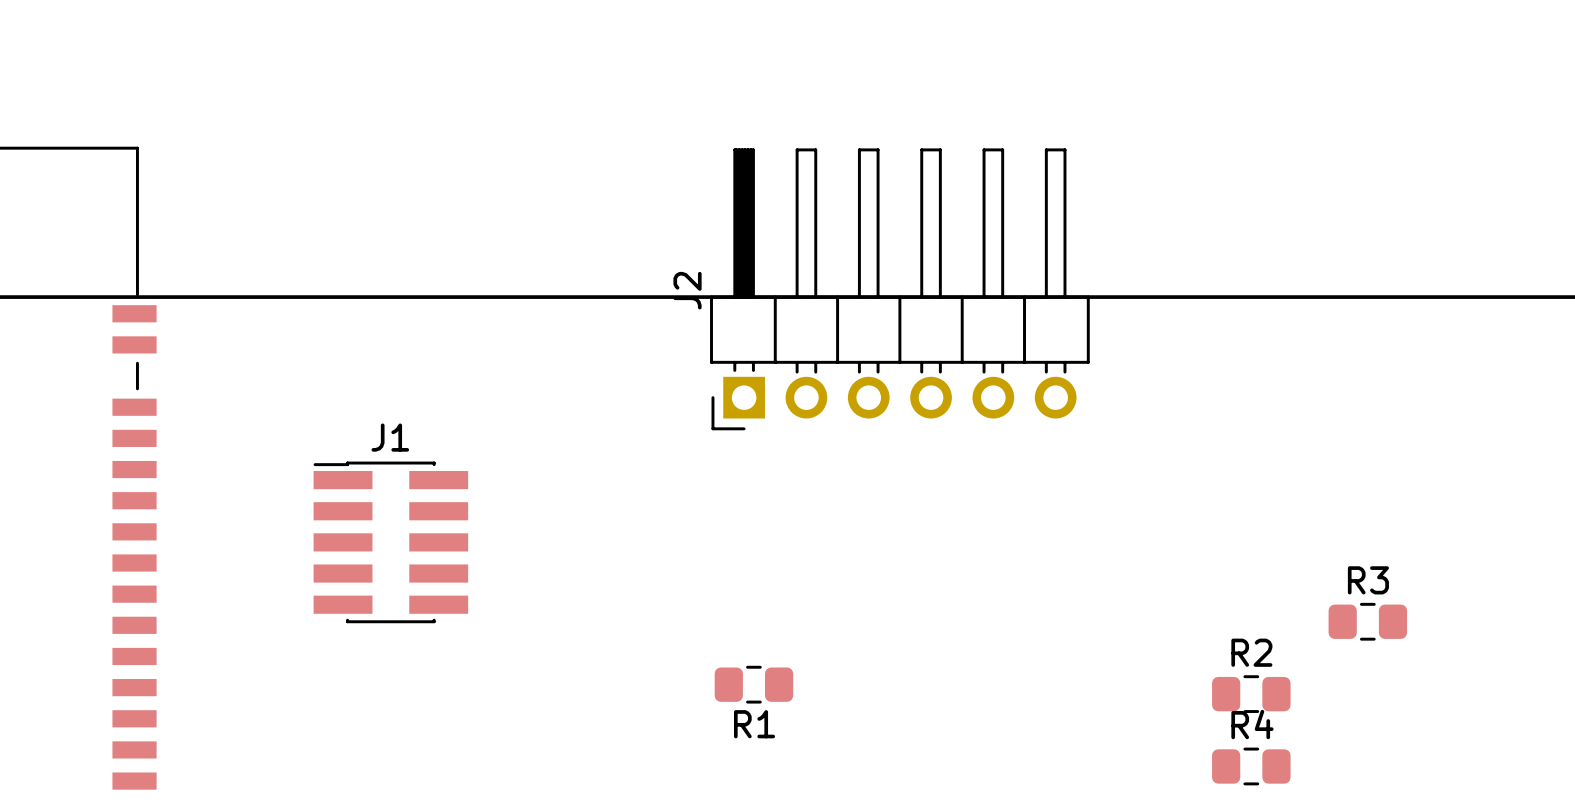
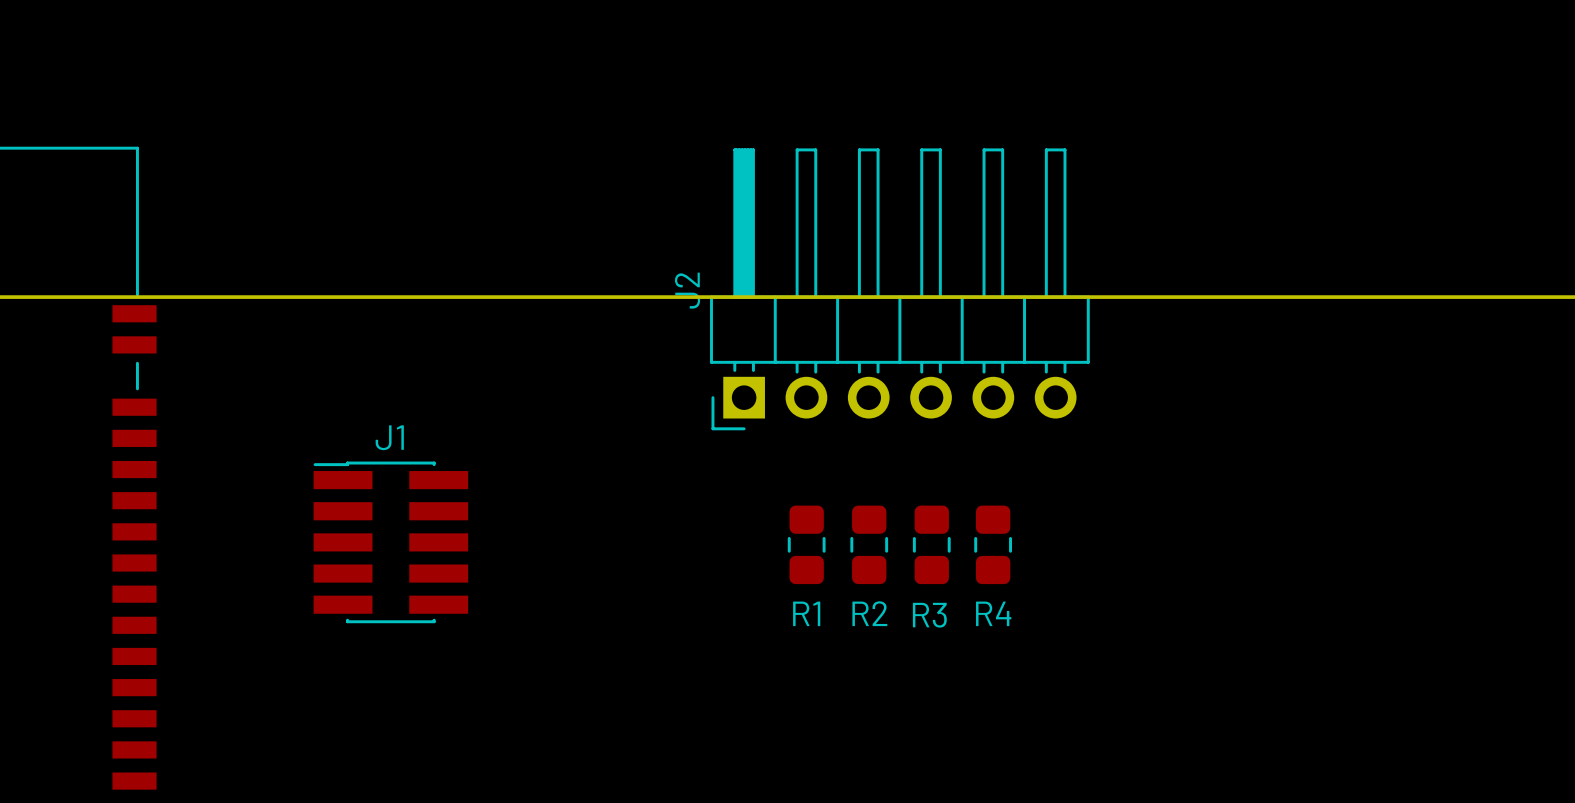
R3 name position: R3 (1368, 580) -> R3 (929, 615)
R3 rotation: 0° (1367, 621) -> 90° clockwise (931, 544)
R3 position: (1367, 621) -> (931, 544)
R2 name position: R2 (1251, 652) -> R2 (869, 613)
R1 rotation: 0° (753, 684) -> 90° clockwise (806, 544)
R1 position: (753, 684) -> (806, 544)
R2 rotation: 0° (1251, 694) -> 90° clockwise (869, 544)
R2 position: (1251, 694) -> (869, 544)
R4 name position: R4 (1252, 724) -> R4 (993, 613)
R4 rotation: 0° (1251, 766) -> 90° clockwise (993, 544)
R4 position: (1251, 766) -> (993, 544)

